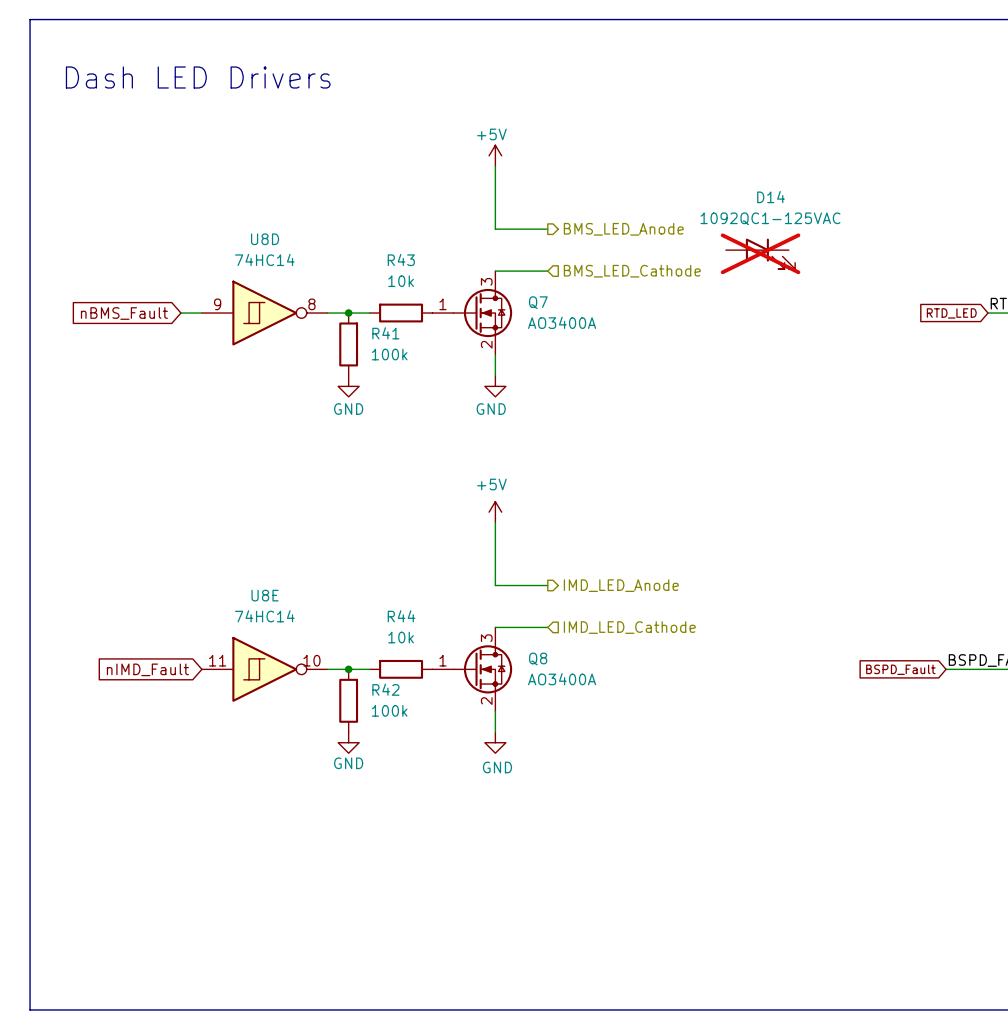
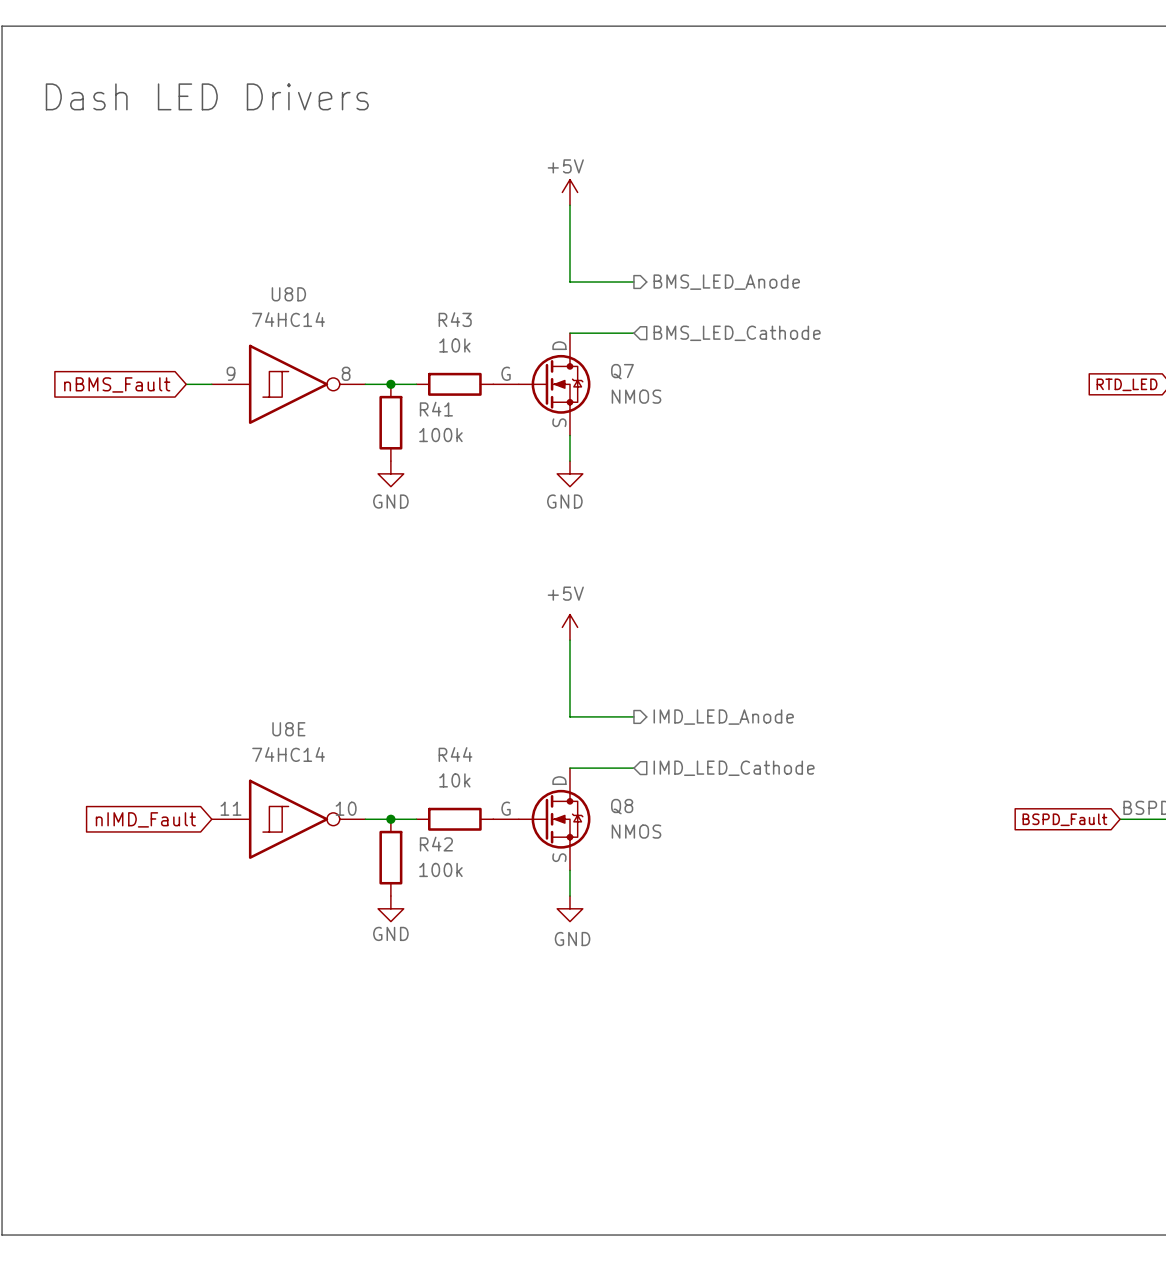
D14: 1092QC1-125VAC (760, 253) -> none
Q7 symbol: [432, 271, 513, 355] -> [493, 333, 591, 436]
Q7 value: AO3400A (562, 322) -> NMOS (636, 396)
Q8 symbol: [432, 627, 513, 712] -> [493, 768, 591, 871]
Q8 value: AO3400A (562, 679) -> NMOS (636, 831)

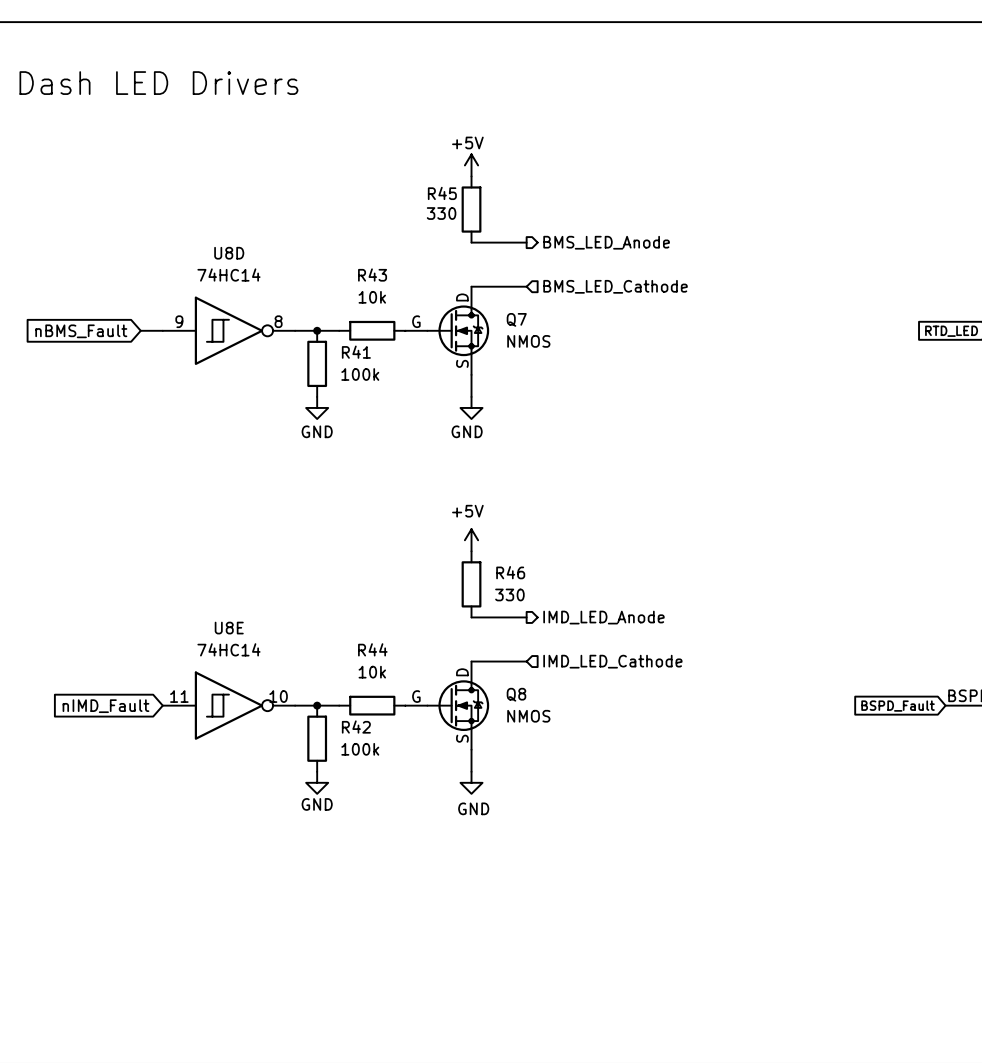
wire: (569, 205) (569, 282) -> none
R45: none -> 330 (471, 209)
wire: (569, 640) (569, 716) -> none
R46: none -> 330 (471, 584)

